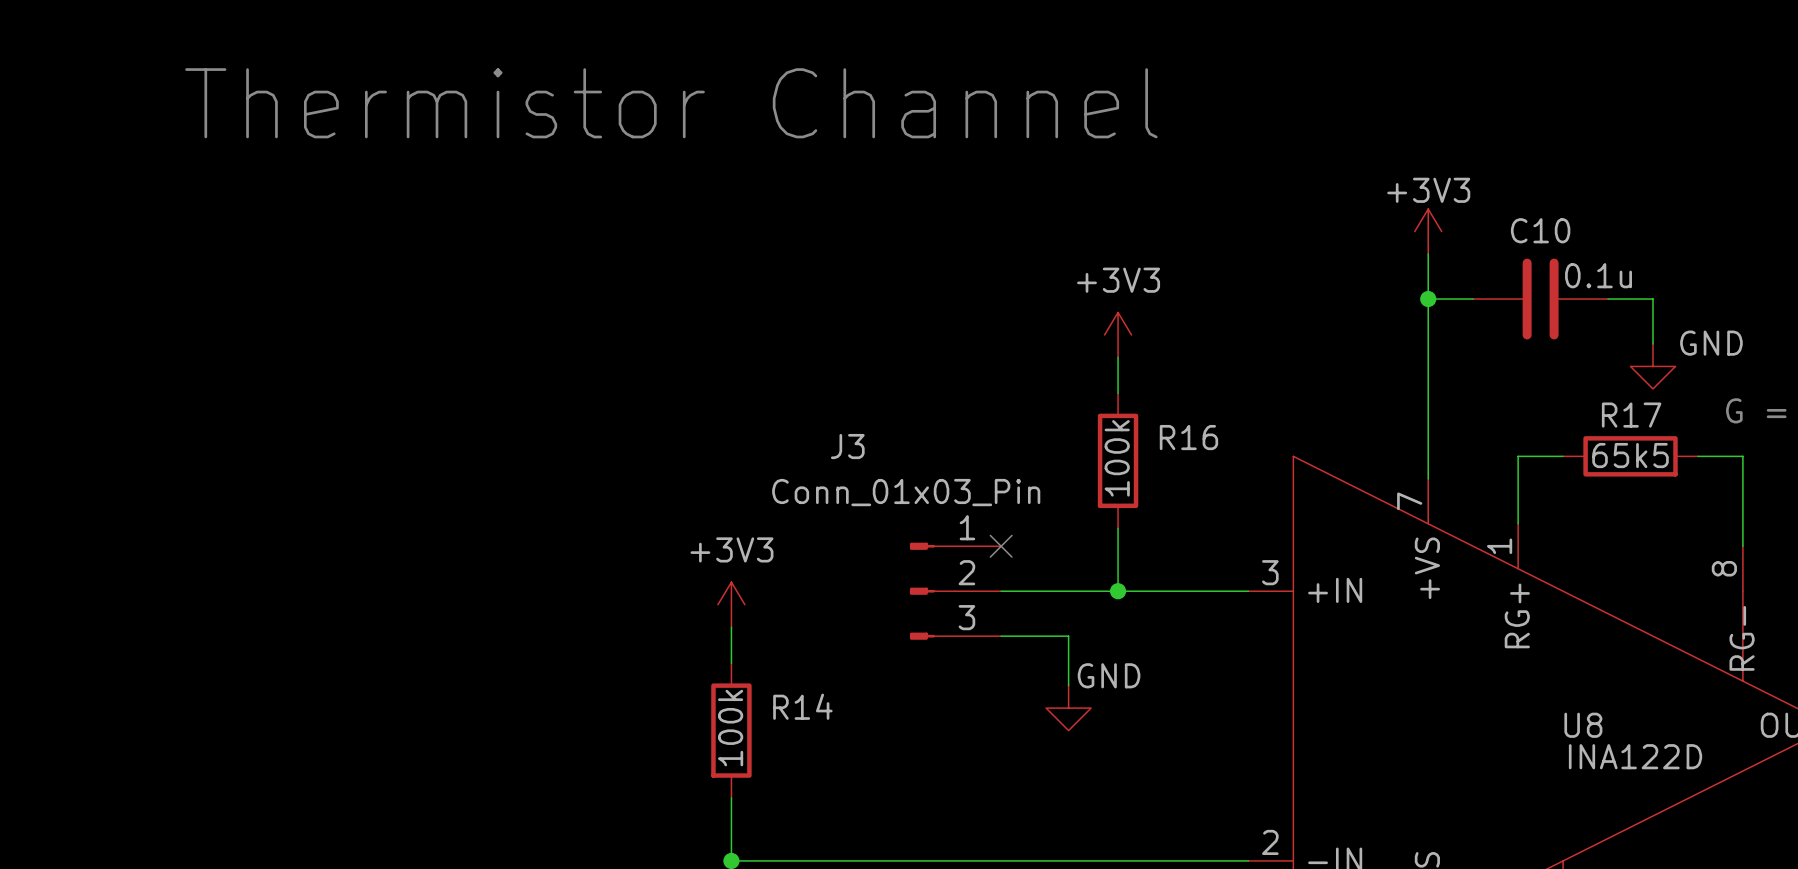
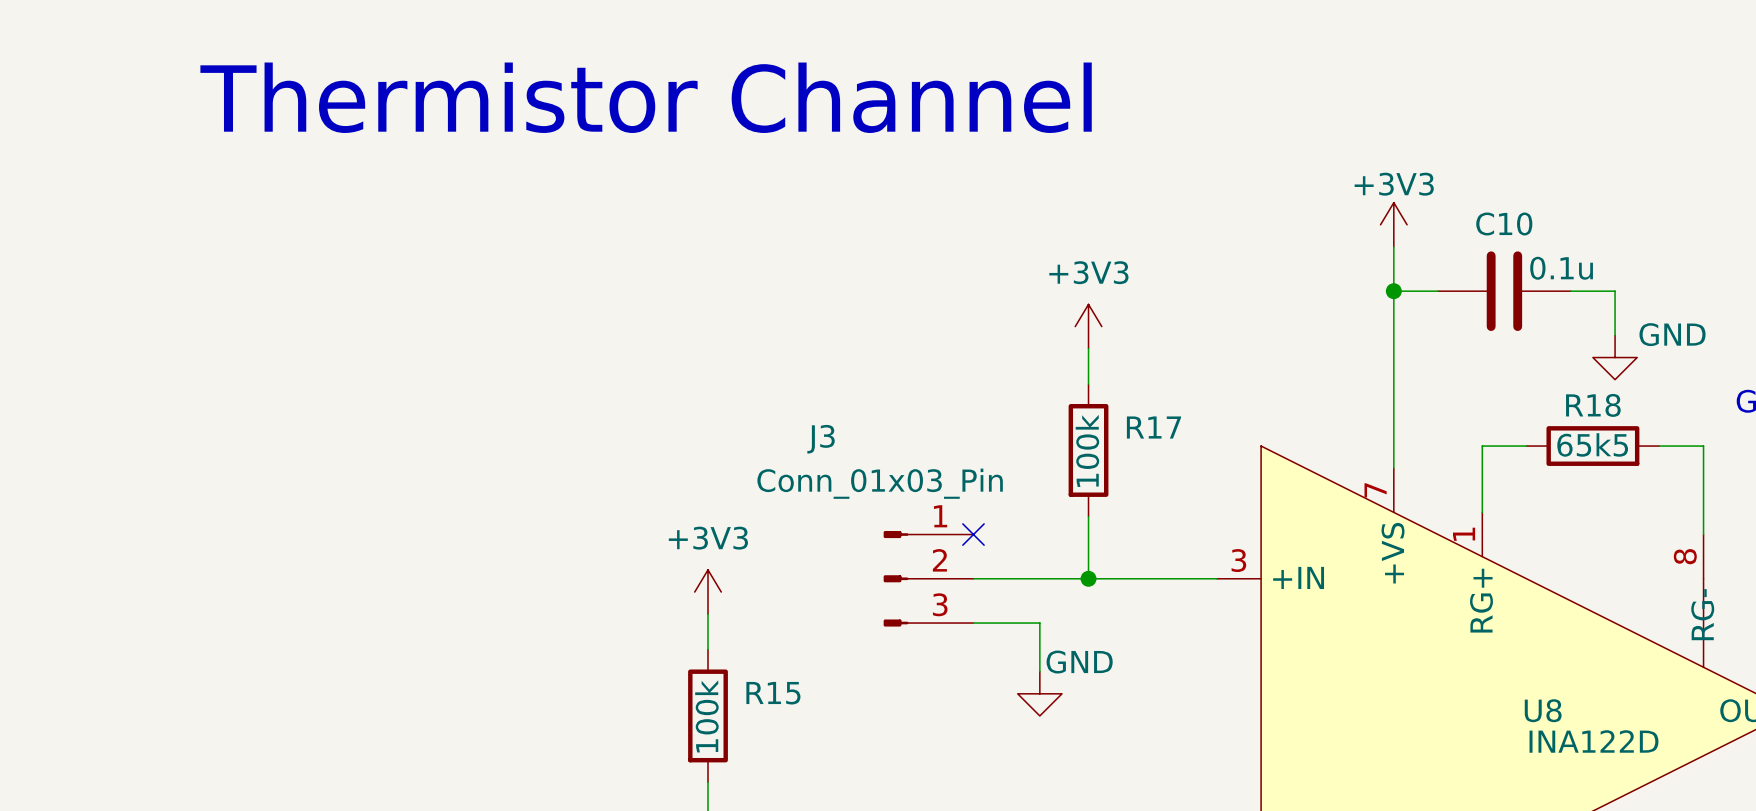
R17 name: R17 (1631, 415) -> R18 (1593, 405)
R16 name: R16 (1188, 437) -> R17 (1153, 427)
R14 name: R14 (802, 706) -> R15 (773, 693)

